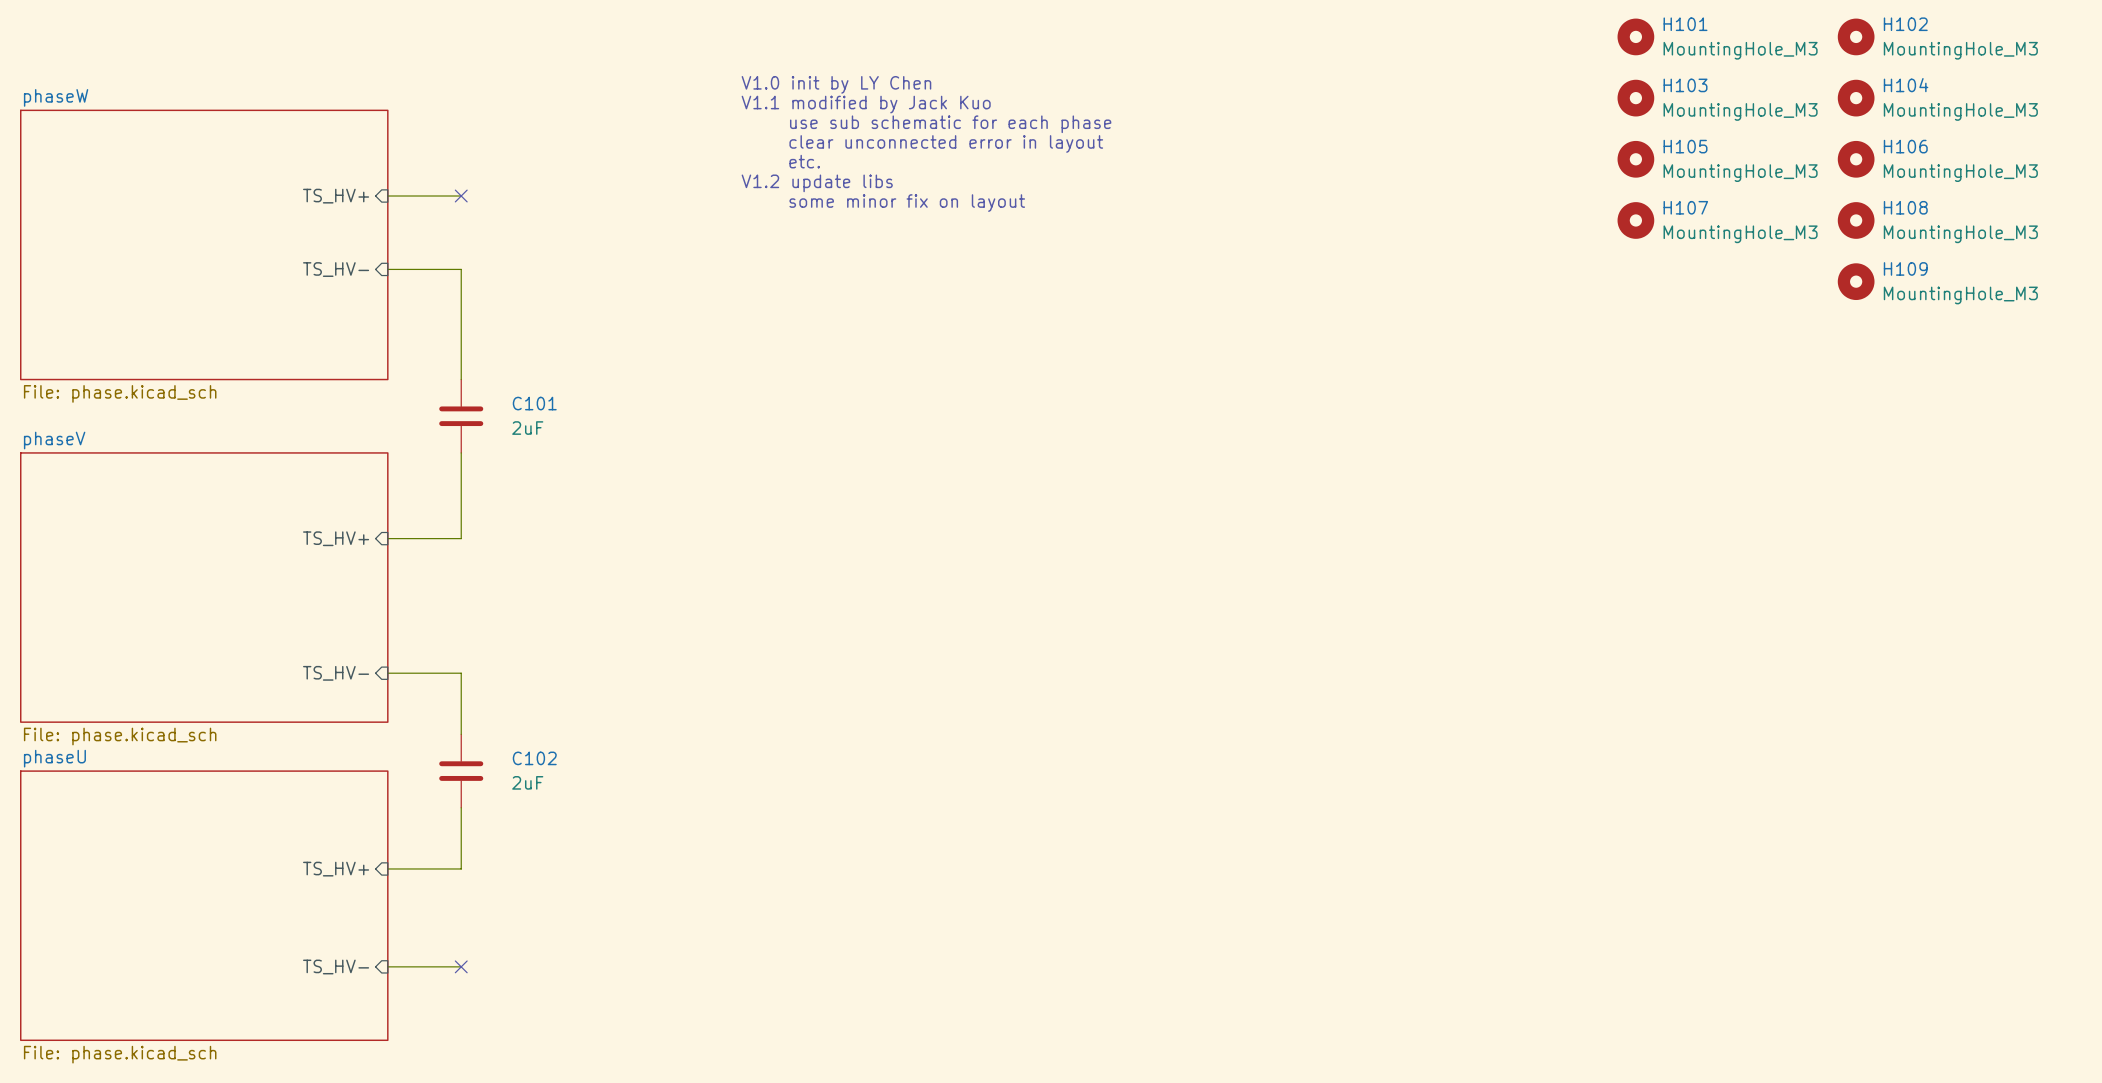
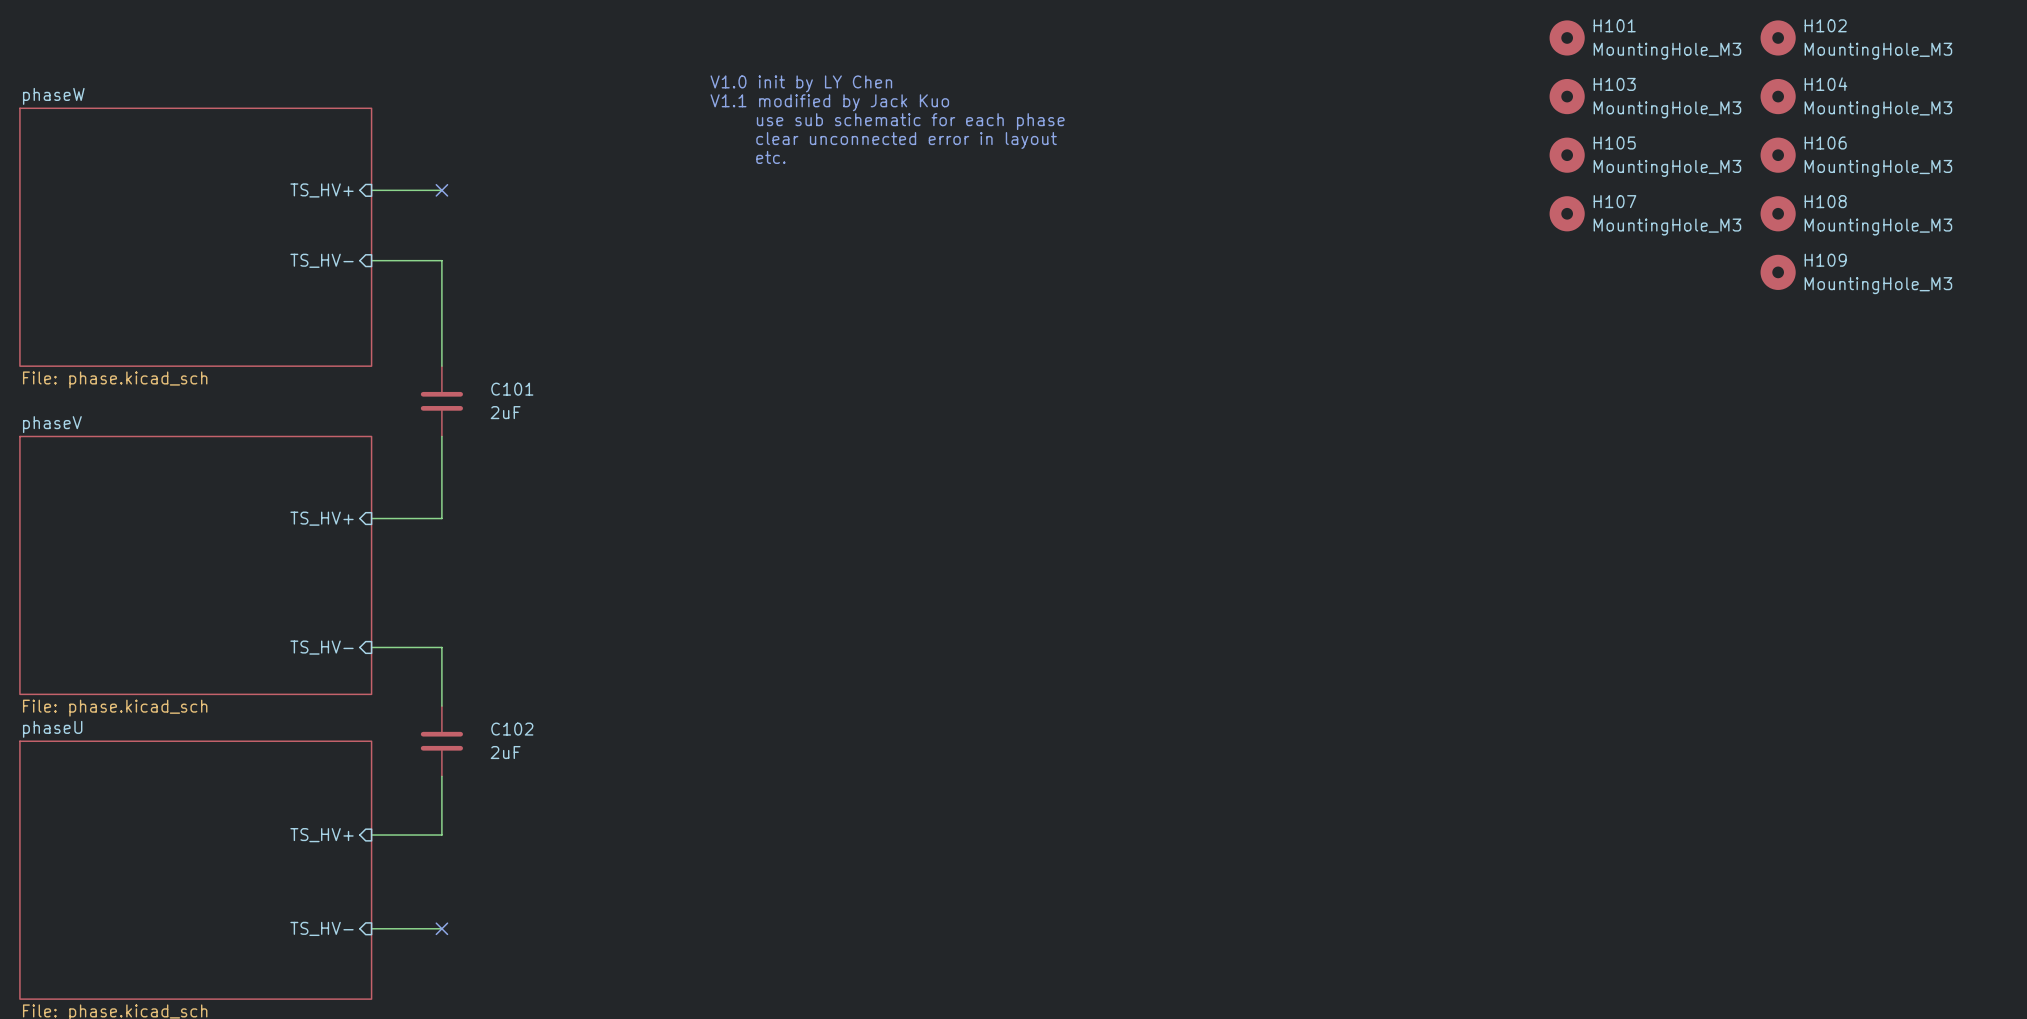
text: V1.2 update libs (817, 183) -> none
text: some minor fix on layout (907, 203) -> none

